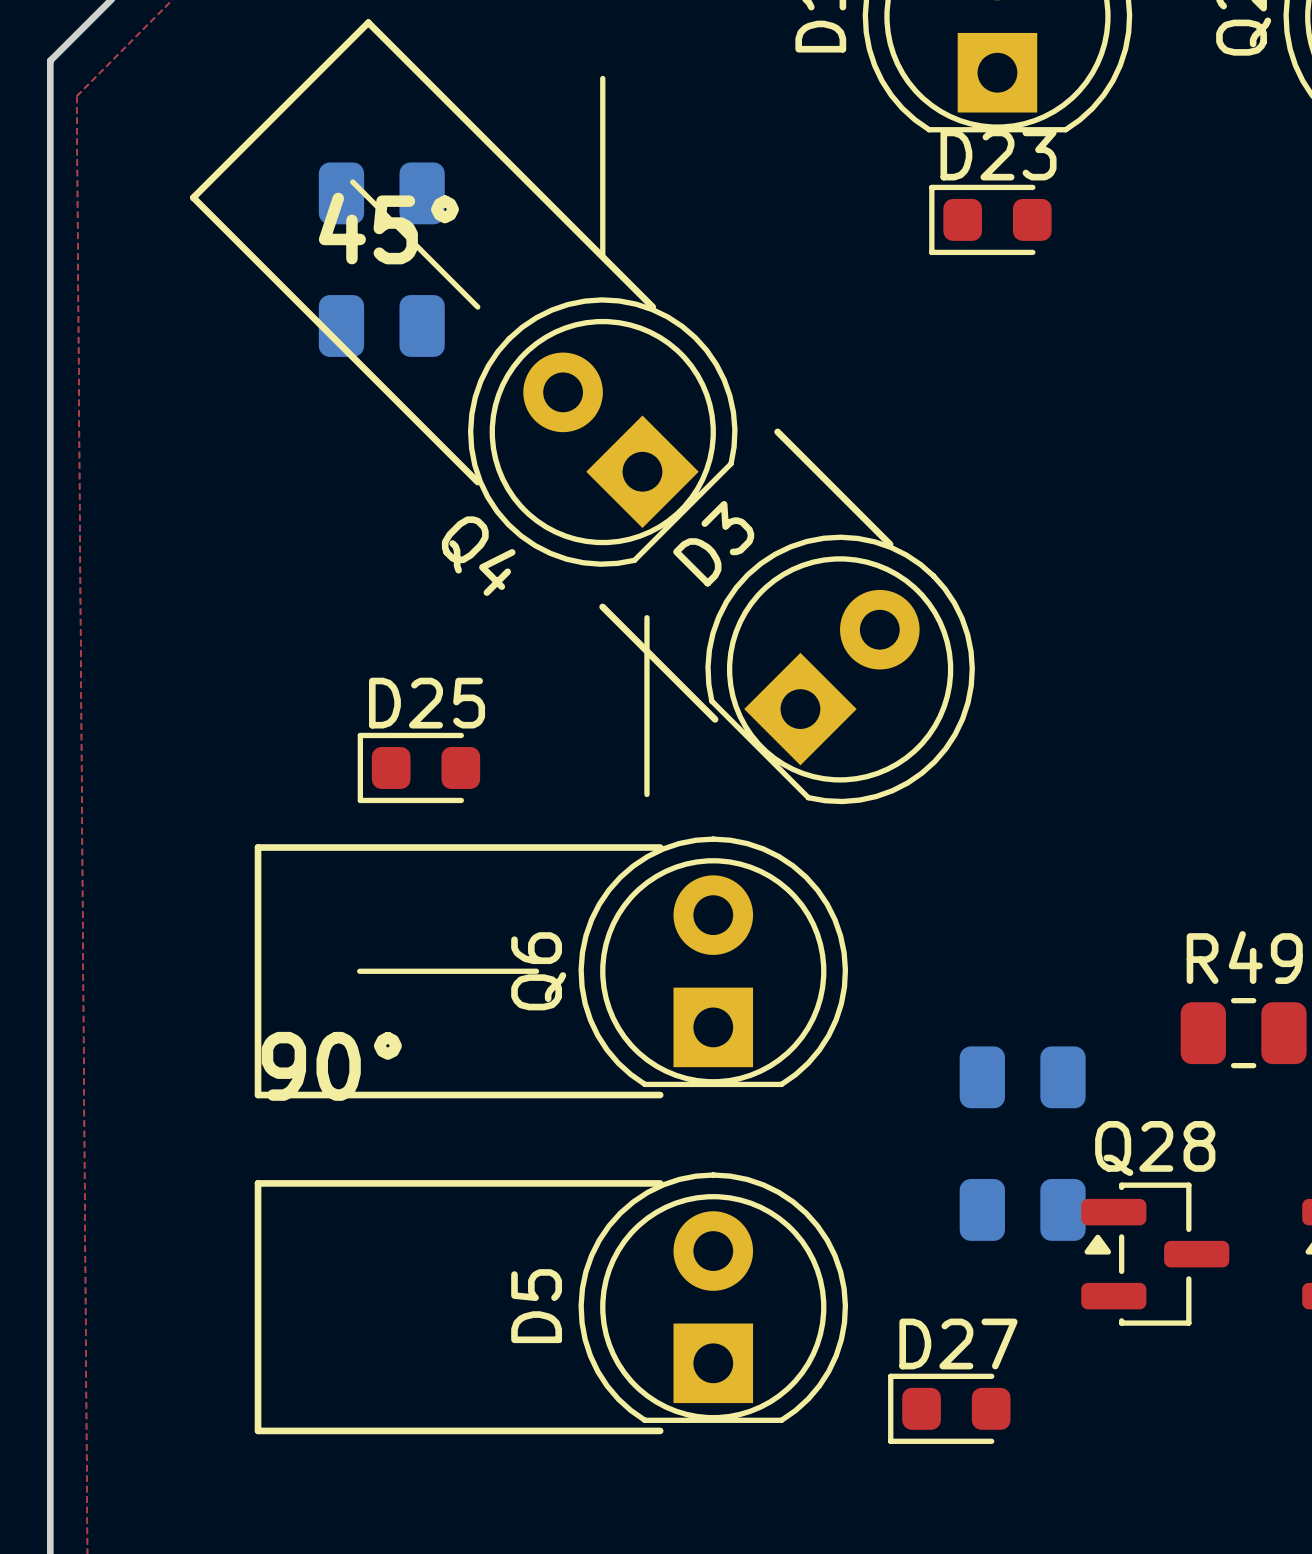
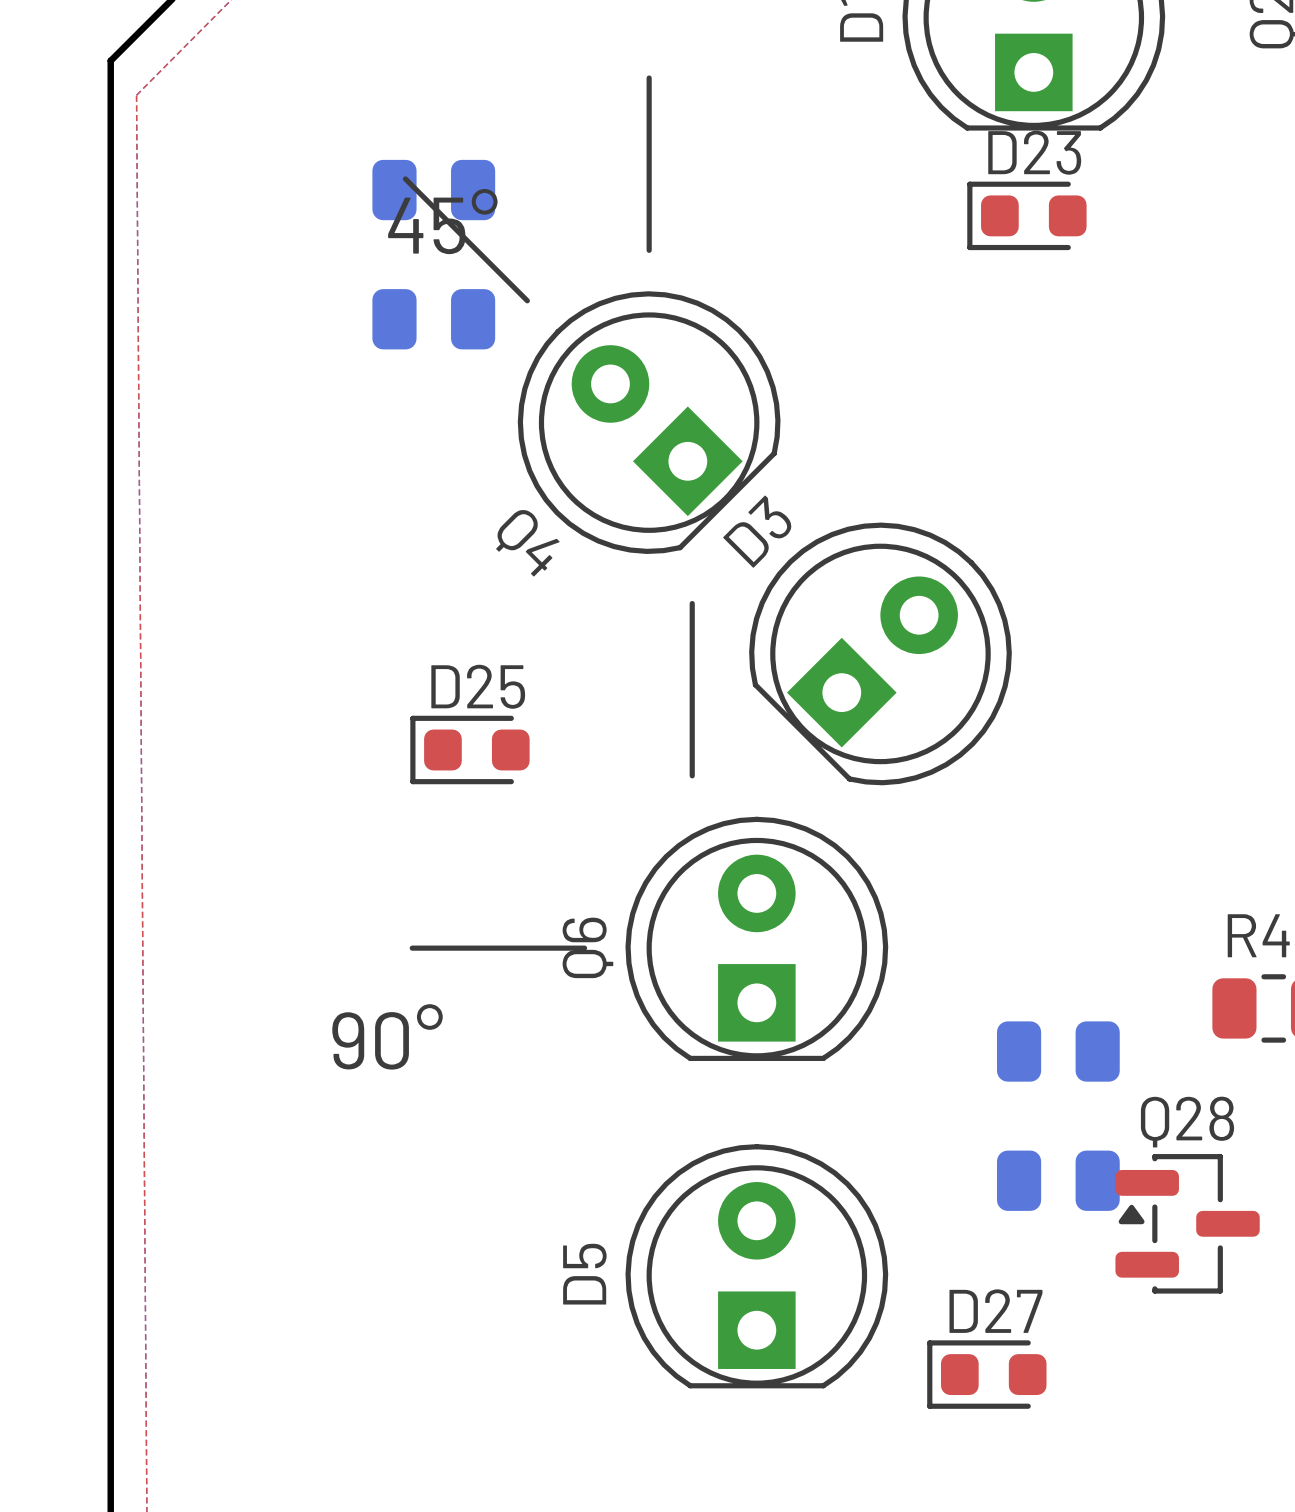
line: (652, 307) (368, 22) (193, 197) (477, 482) -> none
line: (777, 431) (890, 544) -> none
line: (602, 606) (715, 719) -> none
line: (660, 847) (258, 847) (258, 1095) (660, 1095) -> none
line: (660, 1183) (258, 1183) (258, 1430) (660, 1430) -> none

